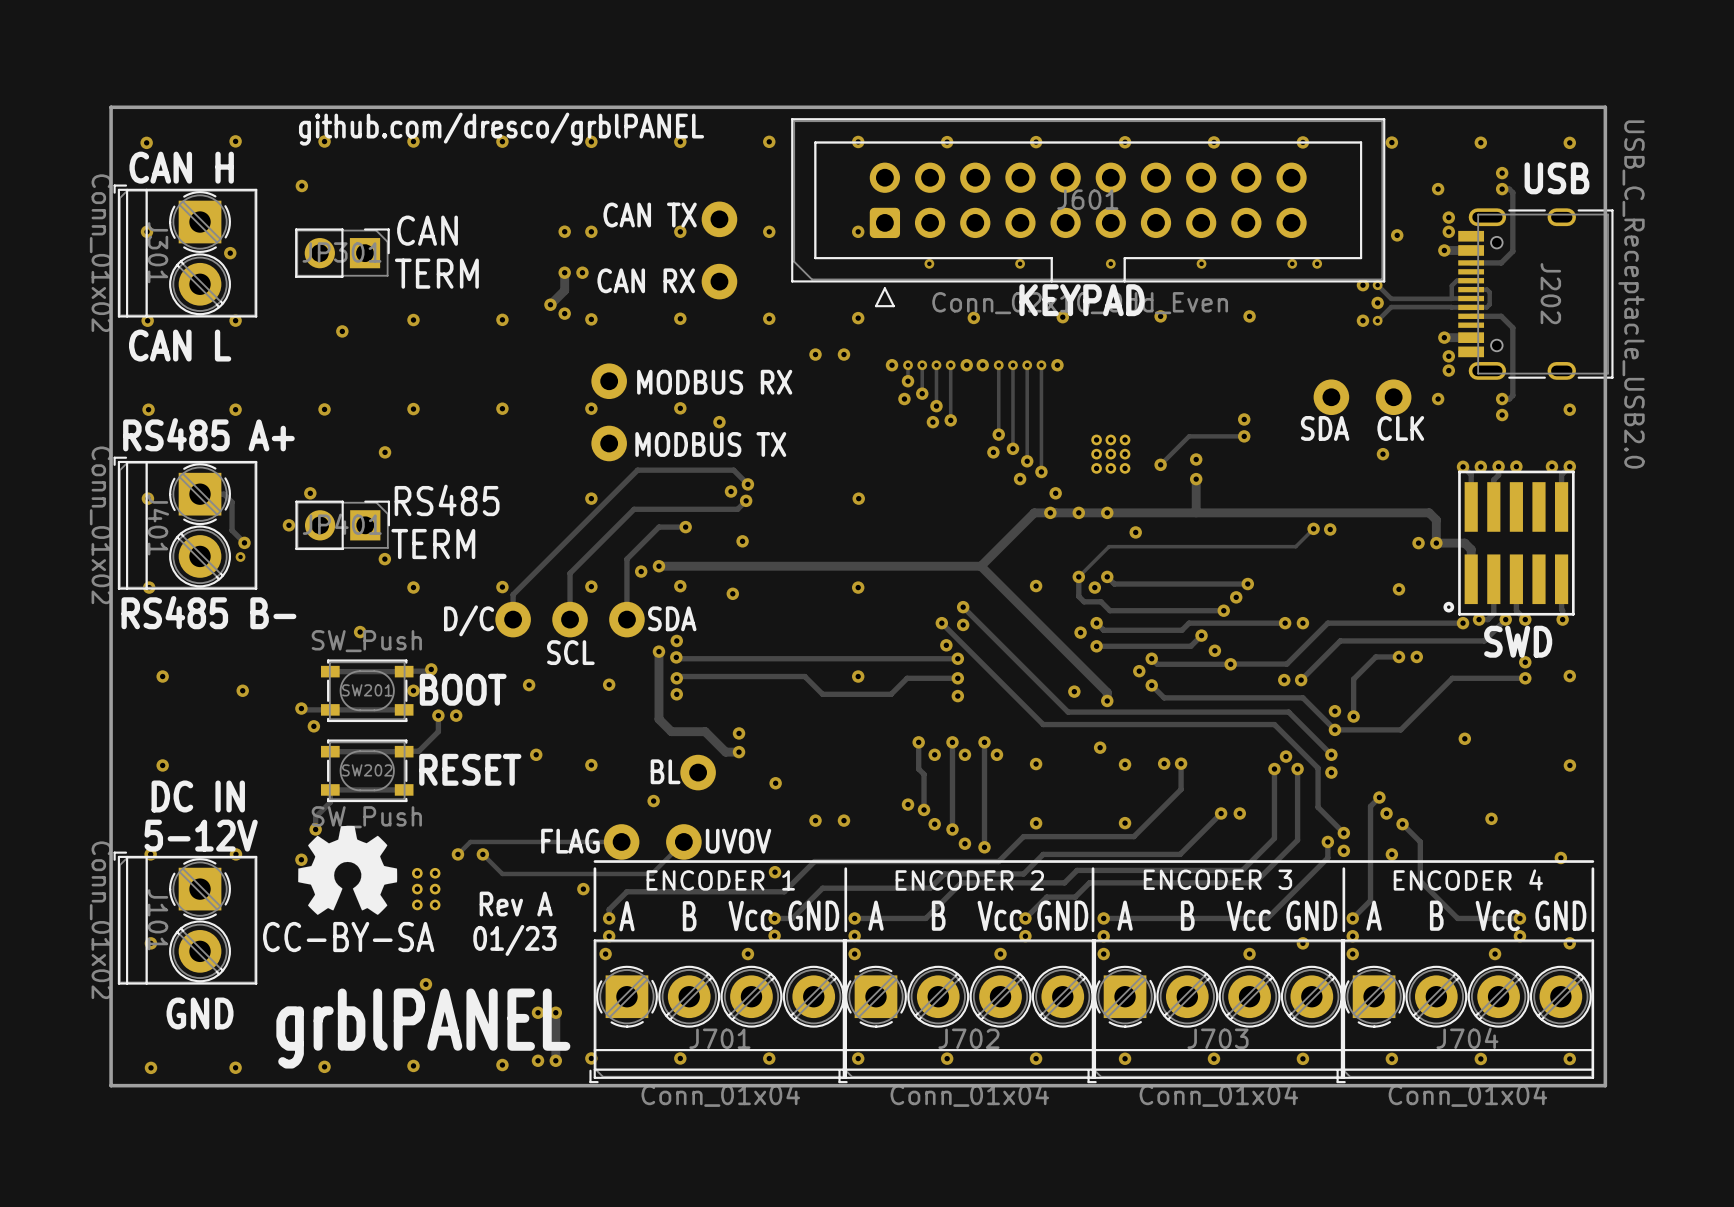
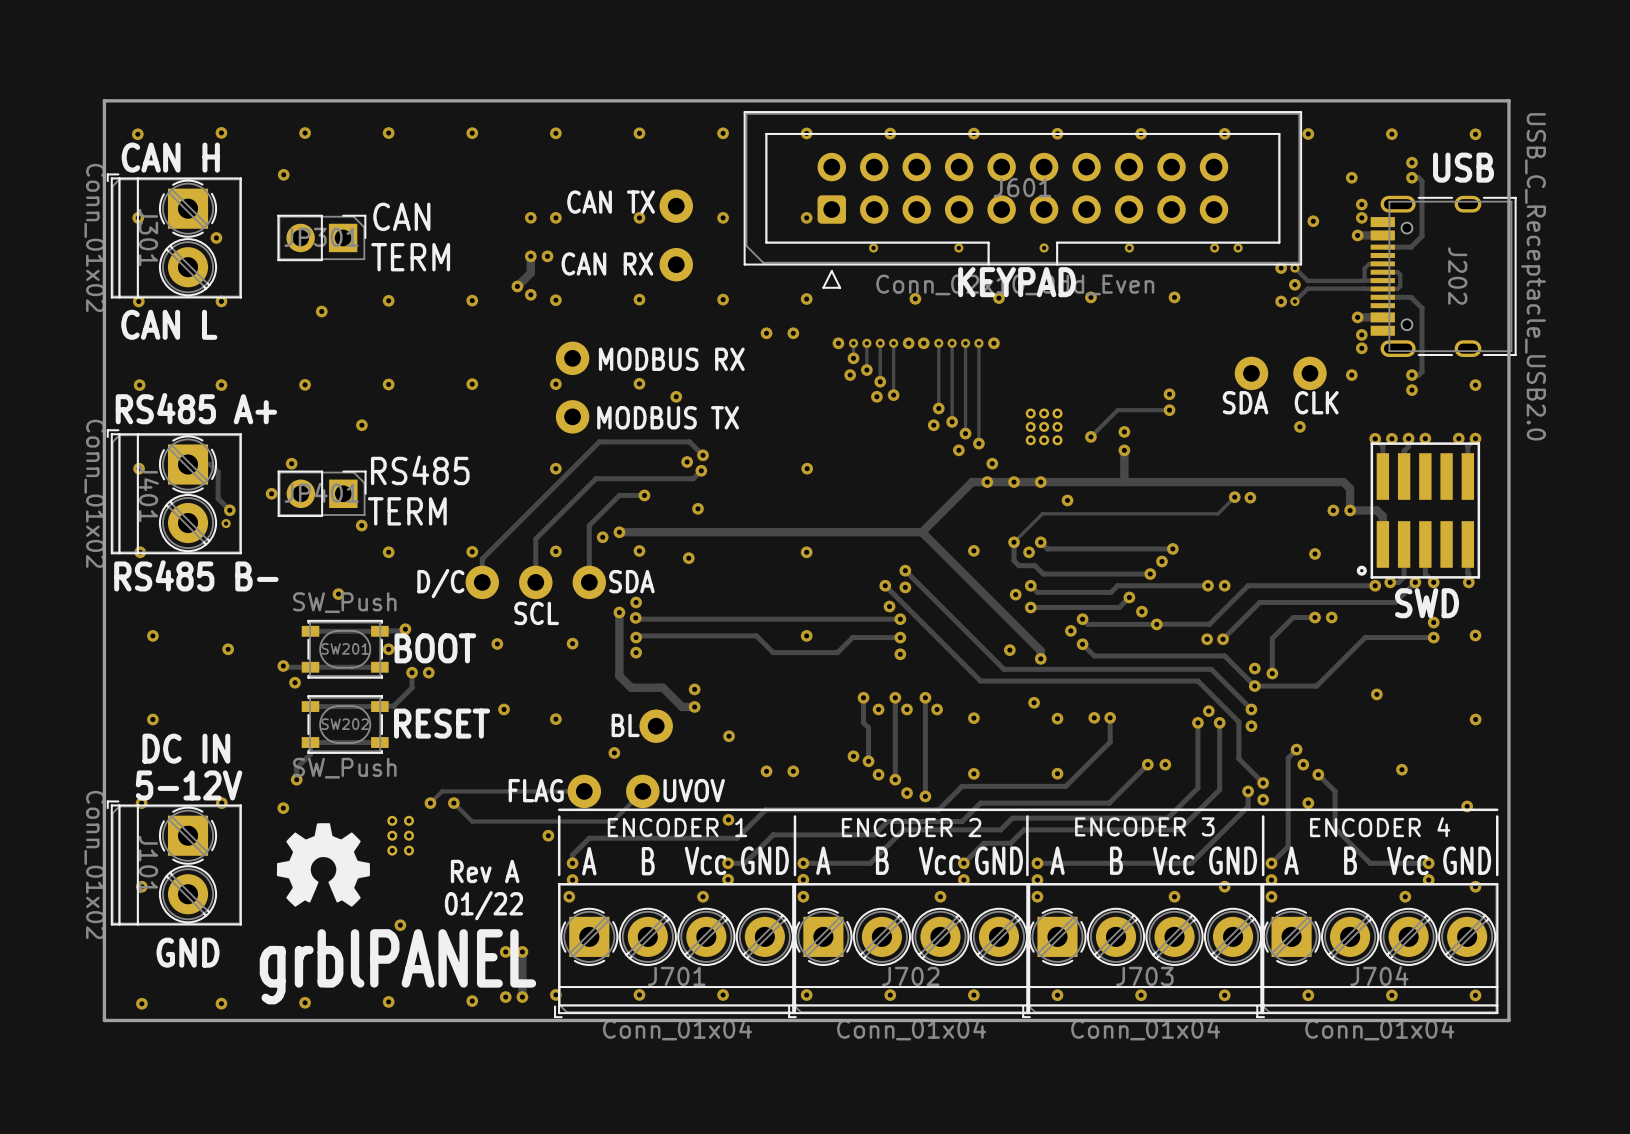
text: github.com/dresco/grblPANEL (501, 129) -> none
drawing position: (347, 870) -> (323, 864)
text: Rev A (516, 904) -> none
text: CC-BY-SA (348, 937) -> none
text: 01/23 (514, 940) -> Rev A (485, 871)
text: none -> 01/22 (483, 905)

